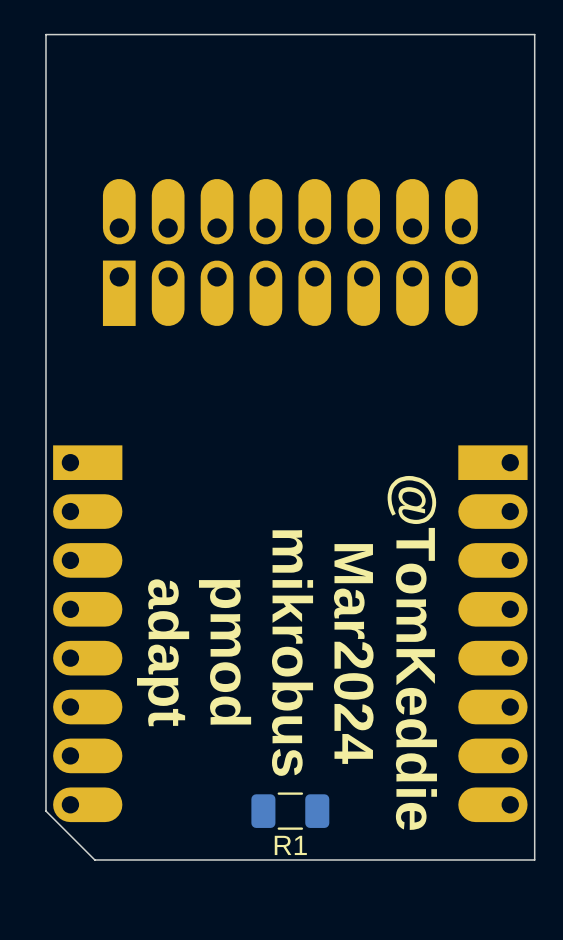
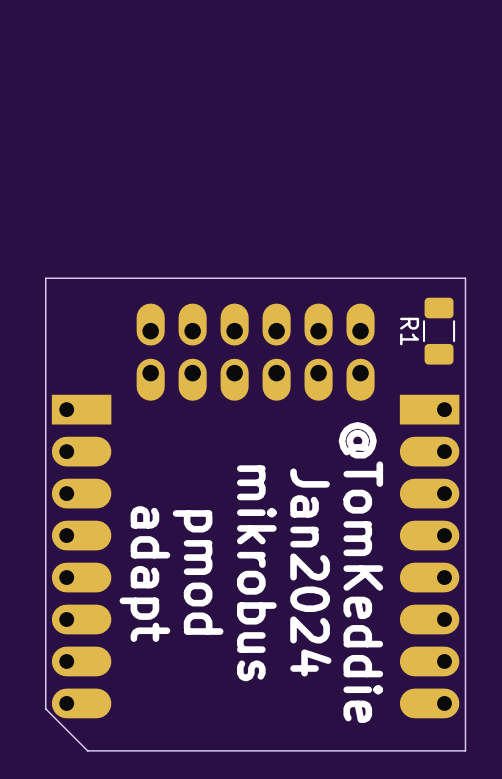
part: (290, 252) -> none
part: none -> (255, 352)
part: (290, 447) -> none
part: none -> (255, 514)
text: Mar2024 (353, 654) -> Jan2024 (310, 572)
R1 rotation: 0° (290, 811) -> 90° clockwise (439, 331)
R1 position: (290, 811) -> (439, 331)

